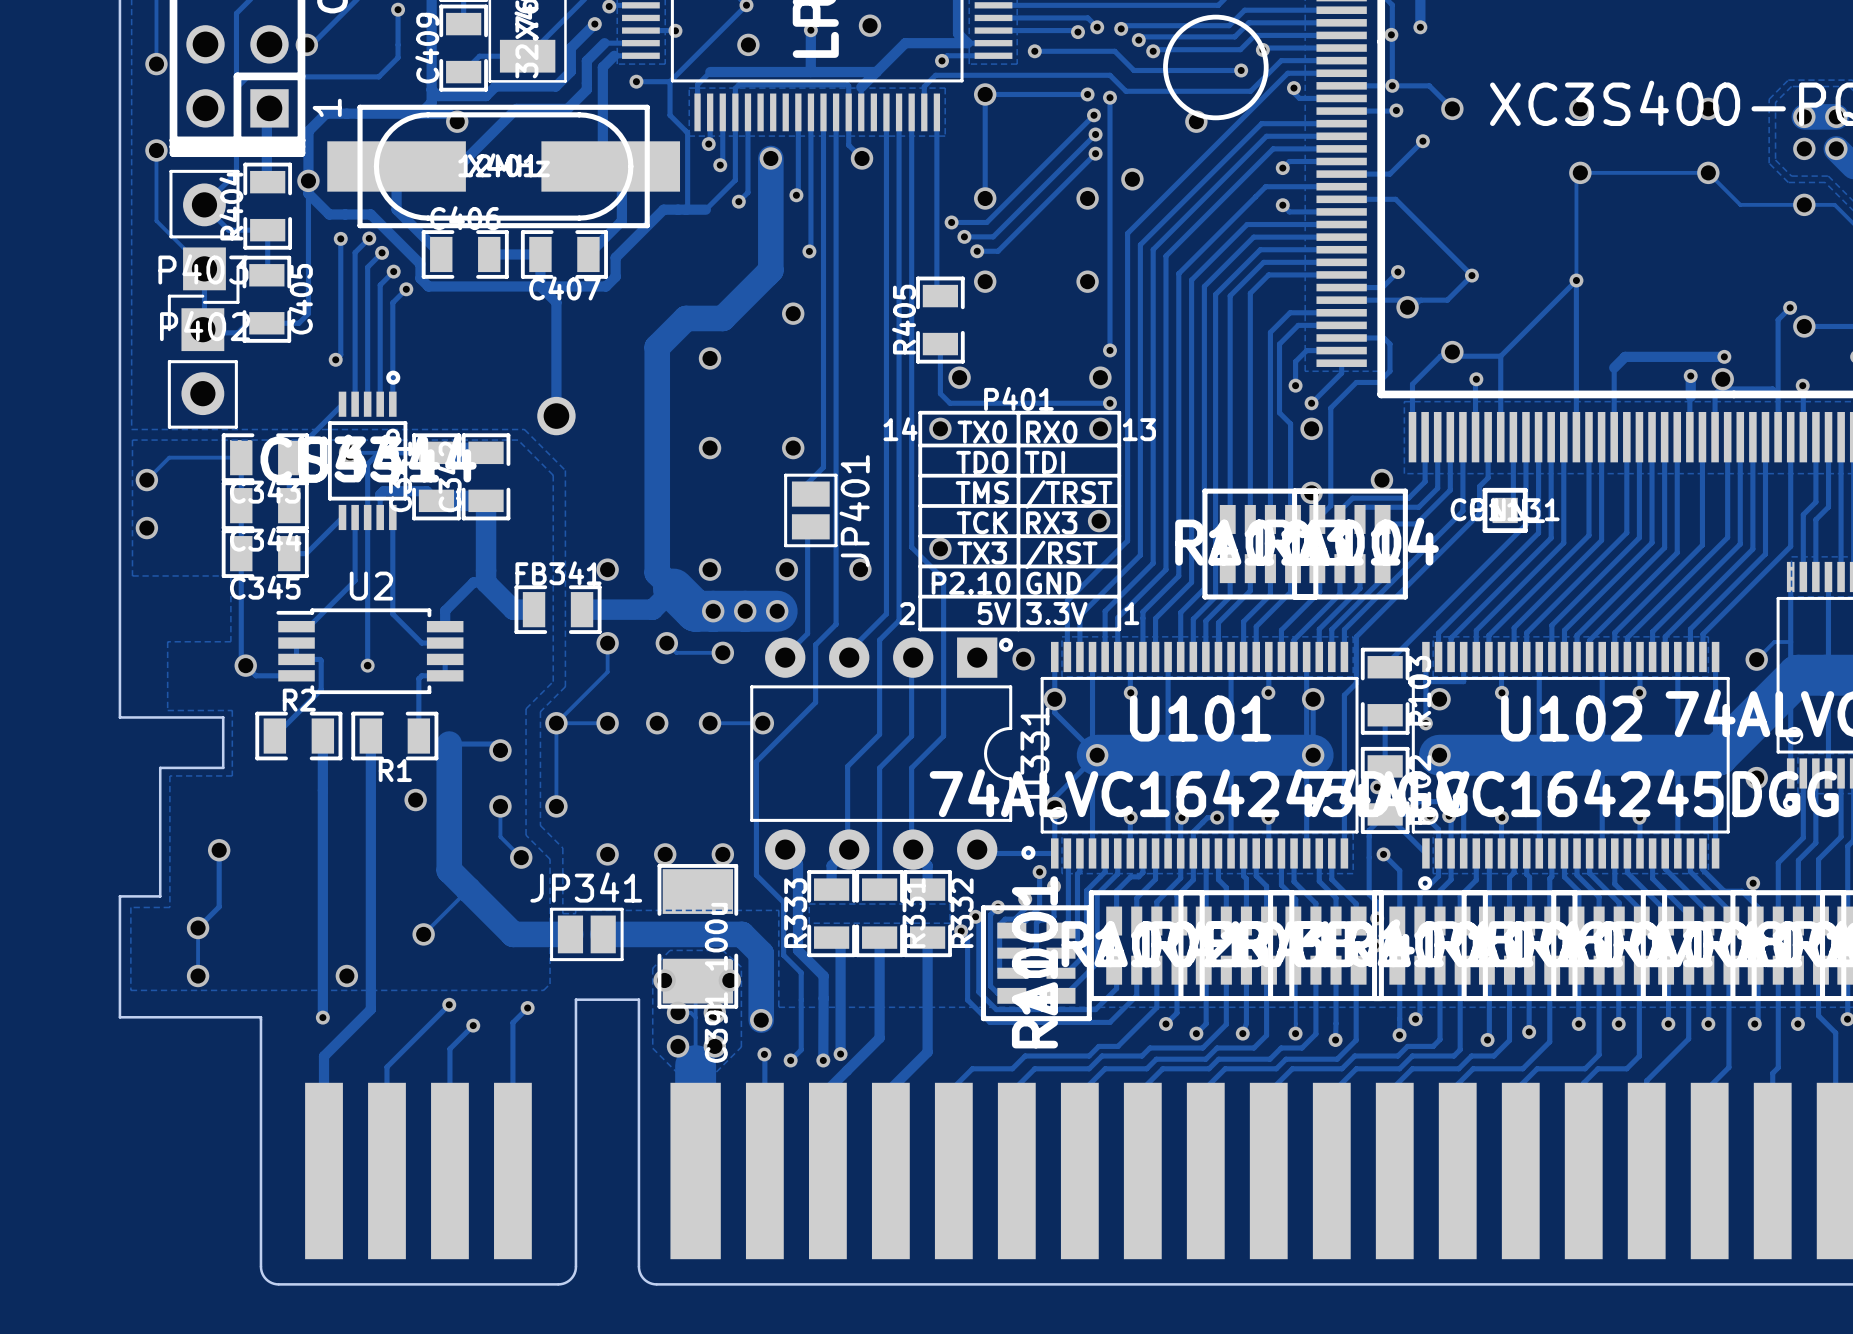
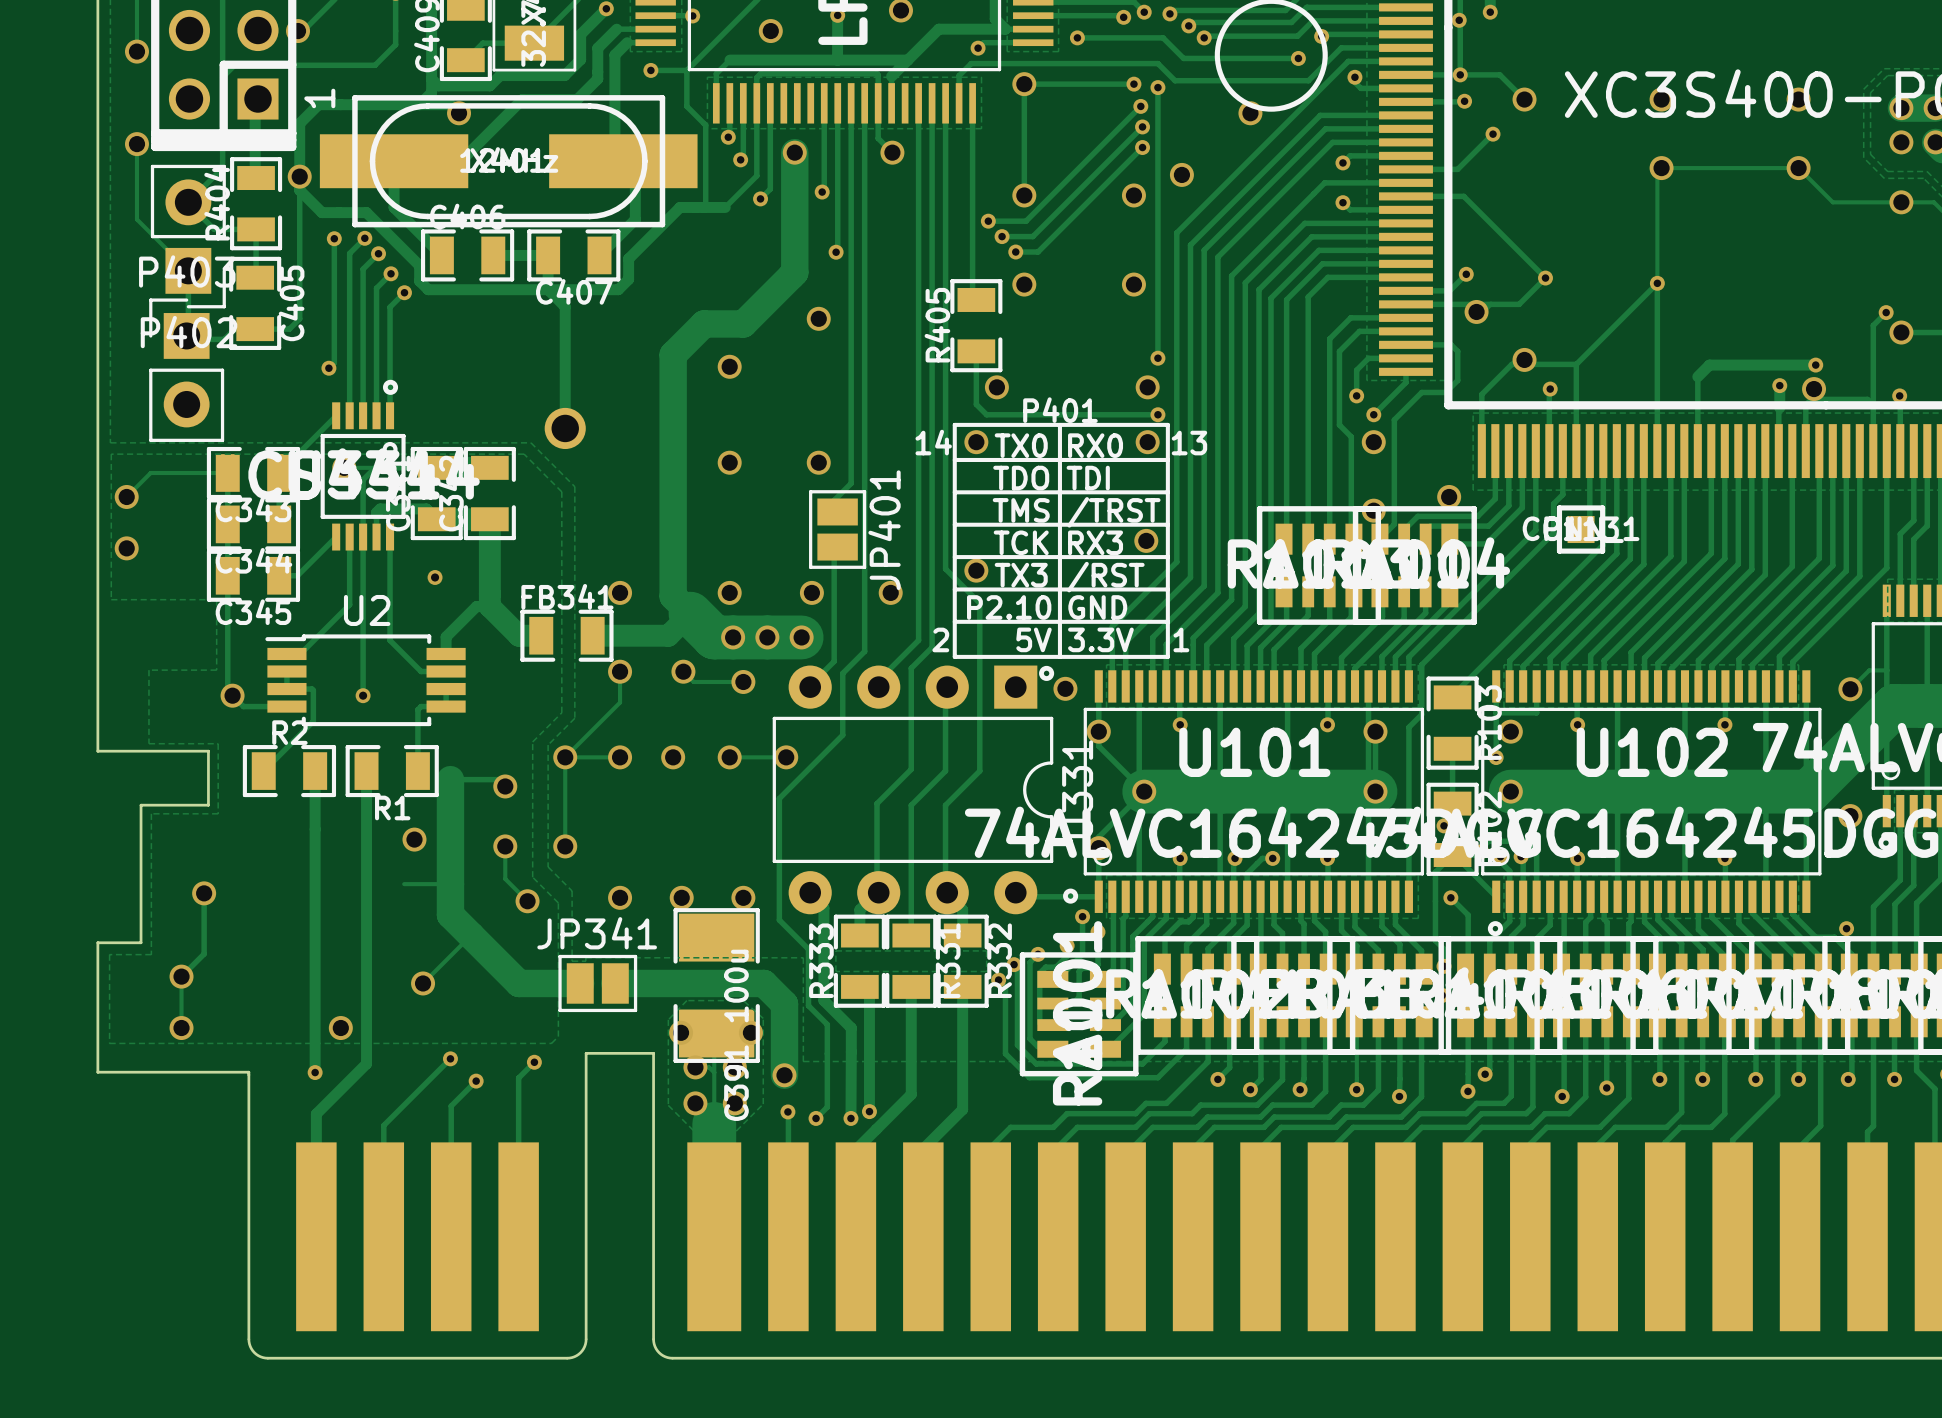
via: none -> (435, 577)
track: none -> (404, 884) (450, 884)

